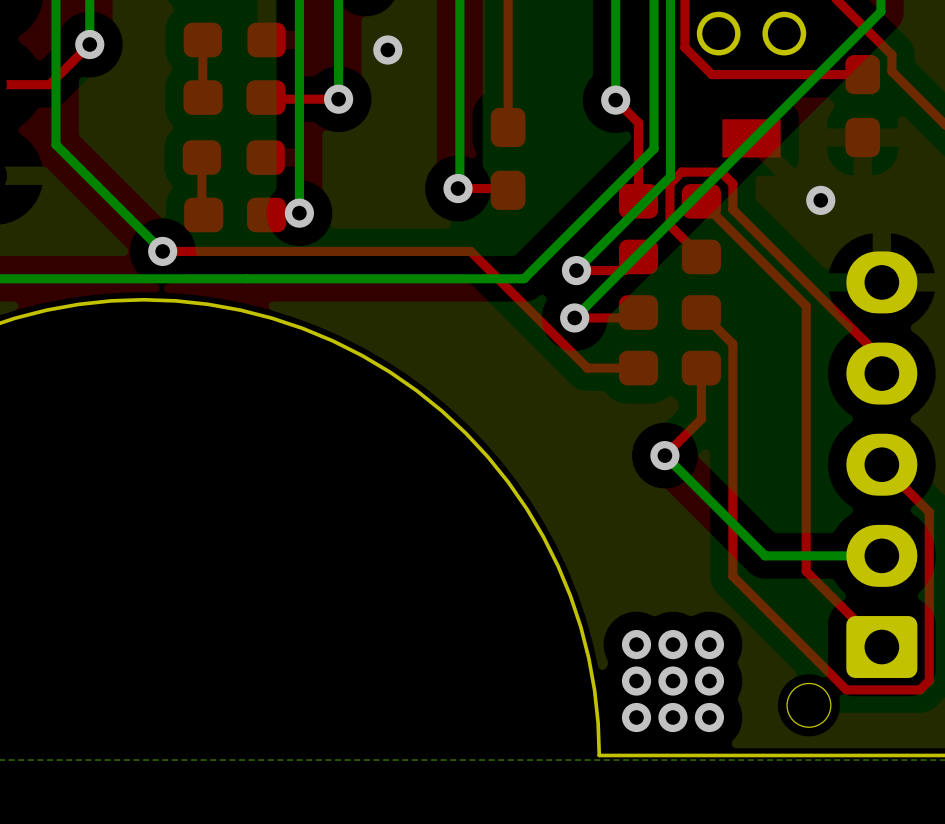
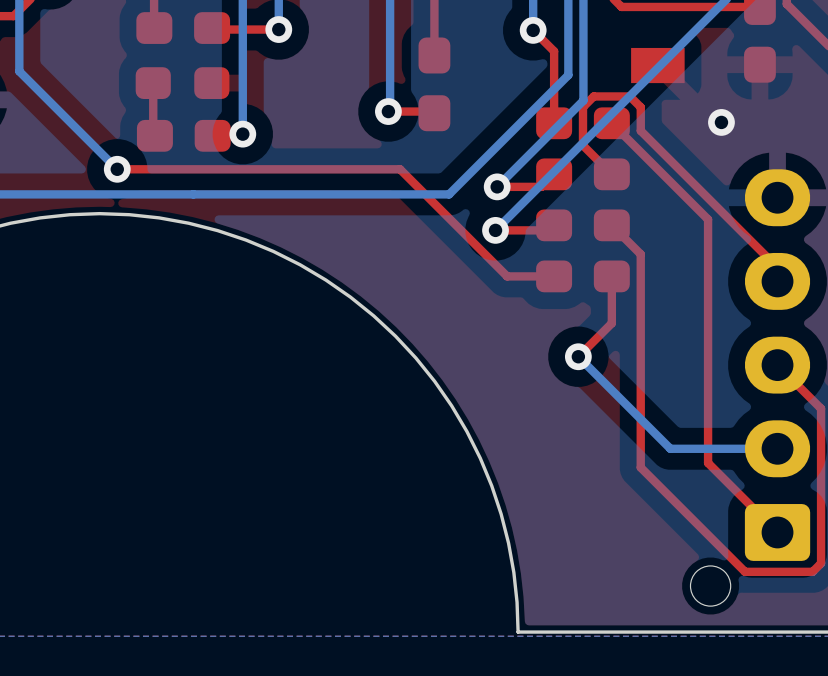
via: (636, 644) -> none
via: (672, 644) -> none
via: (709, 644) -> none
via: (636, 681) -> none
via: (672, 681) -> none
via: (709, 681) -> none
via: (636, 717) -> none
via: (672, 717) -> none
via: (709, 717) -> none

